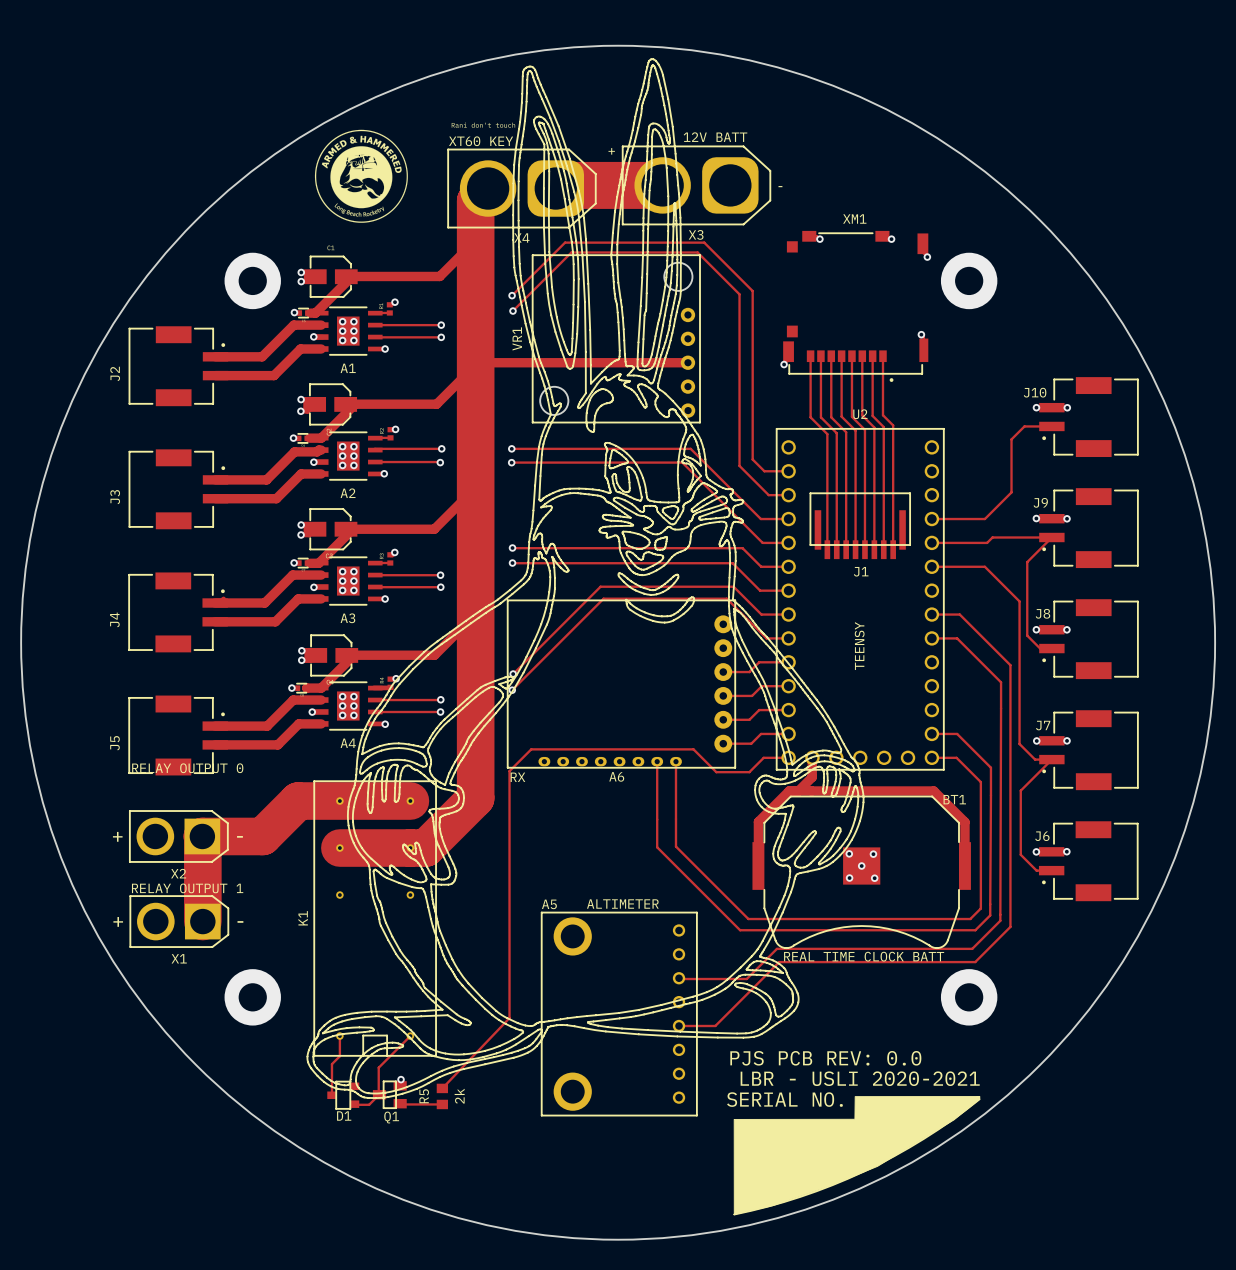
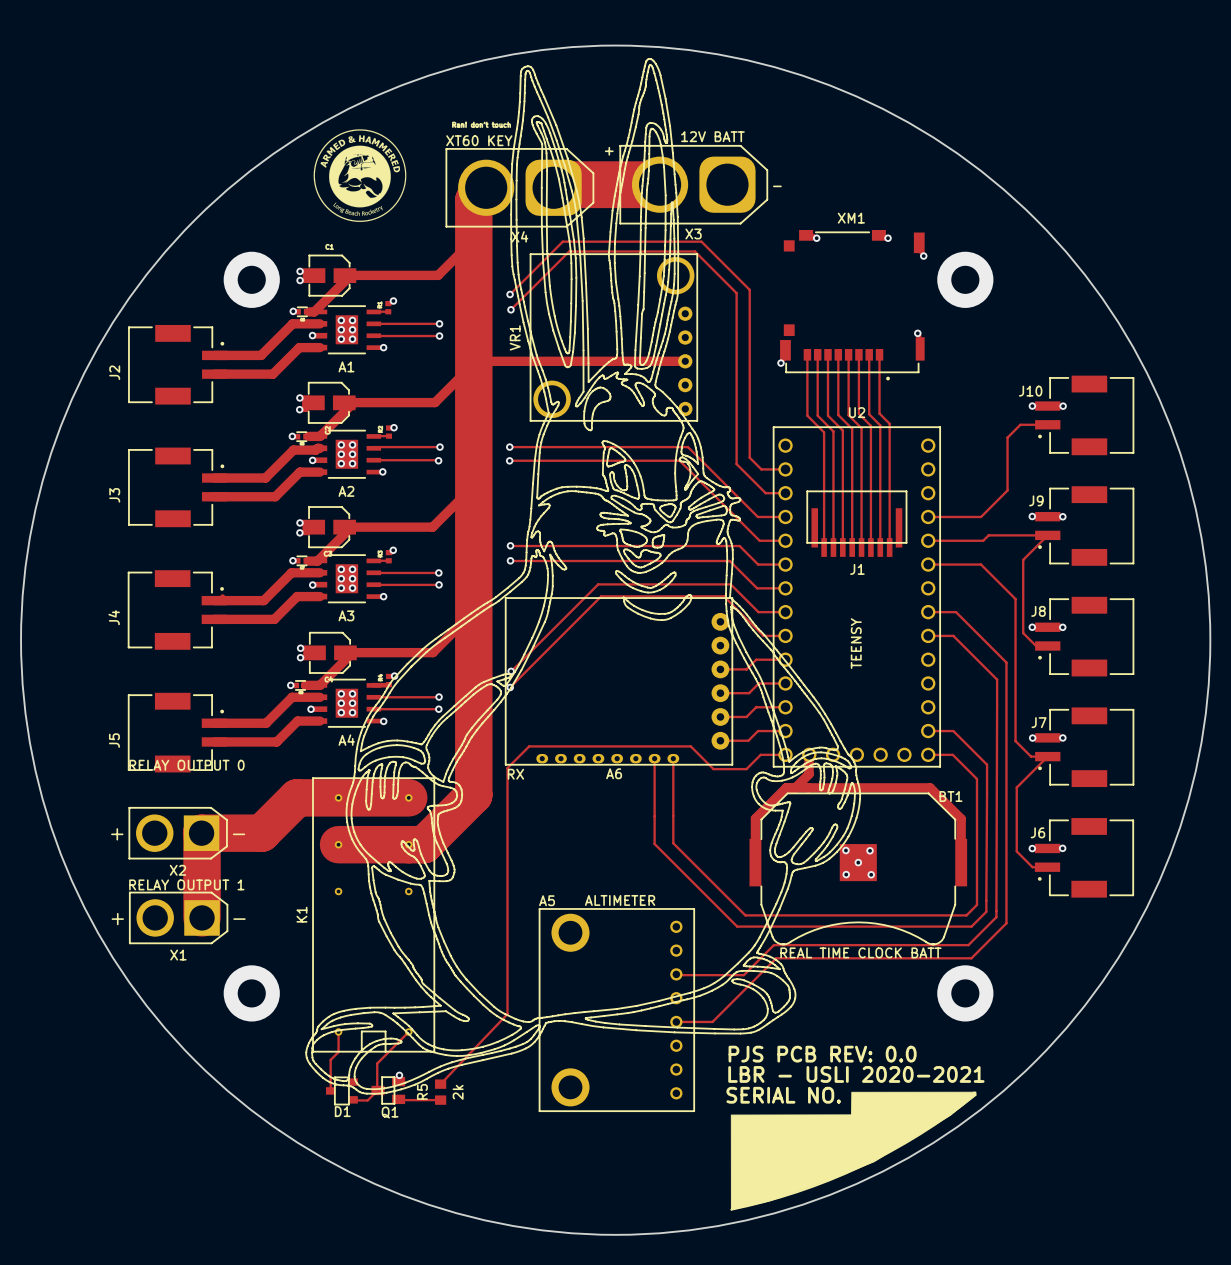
VR1 footprint: [532, 254, 701, 424] -> [530, 253, 698, 422]

